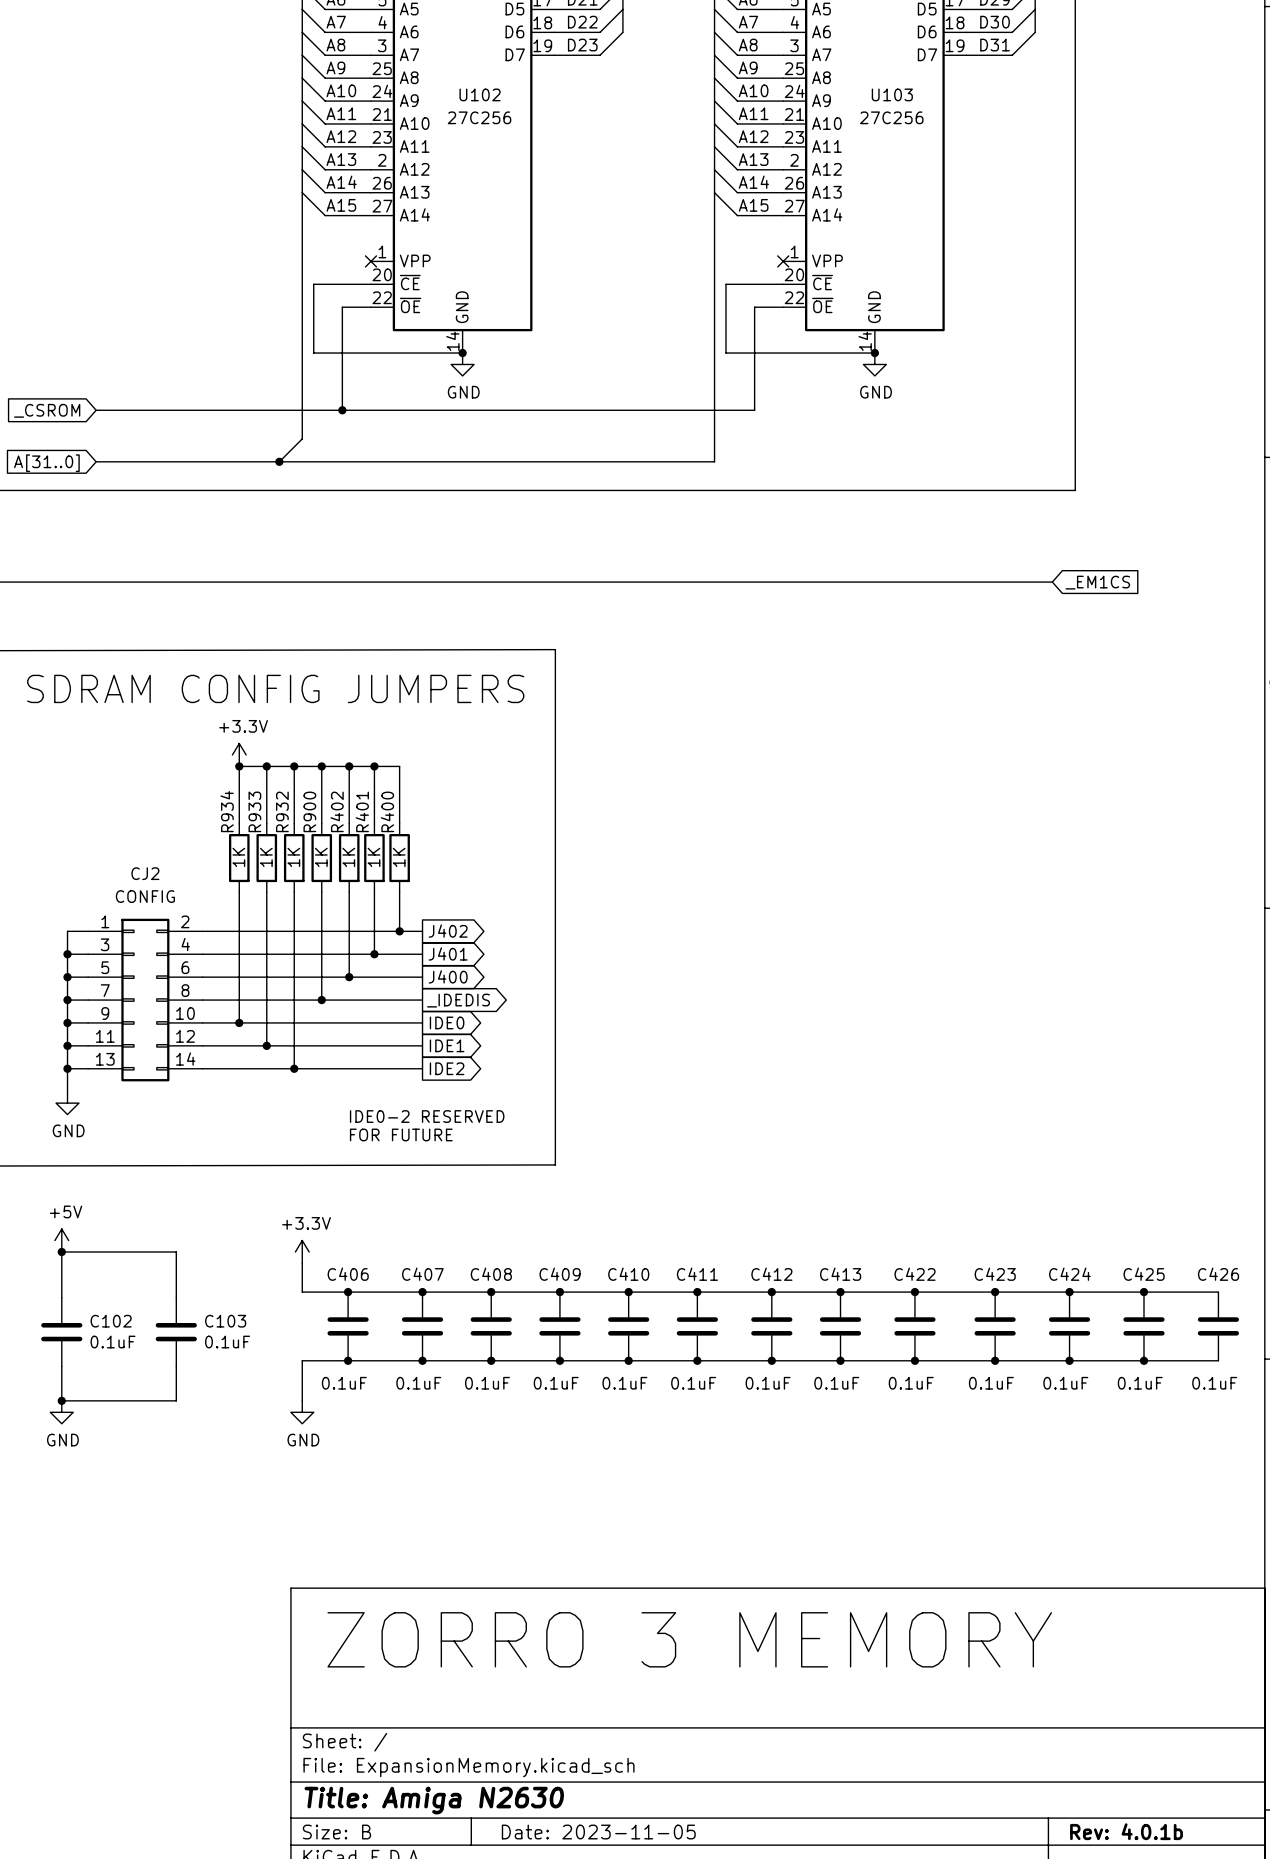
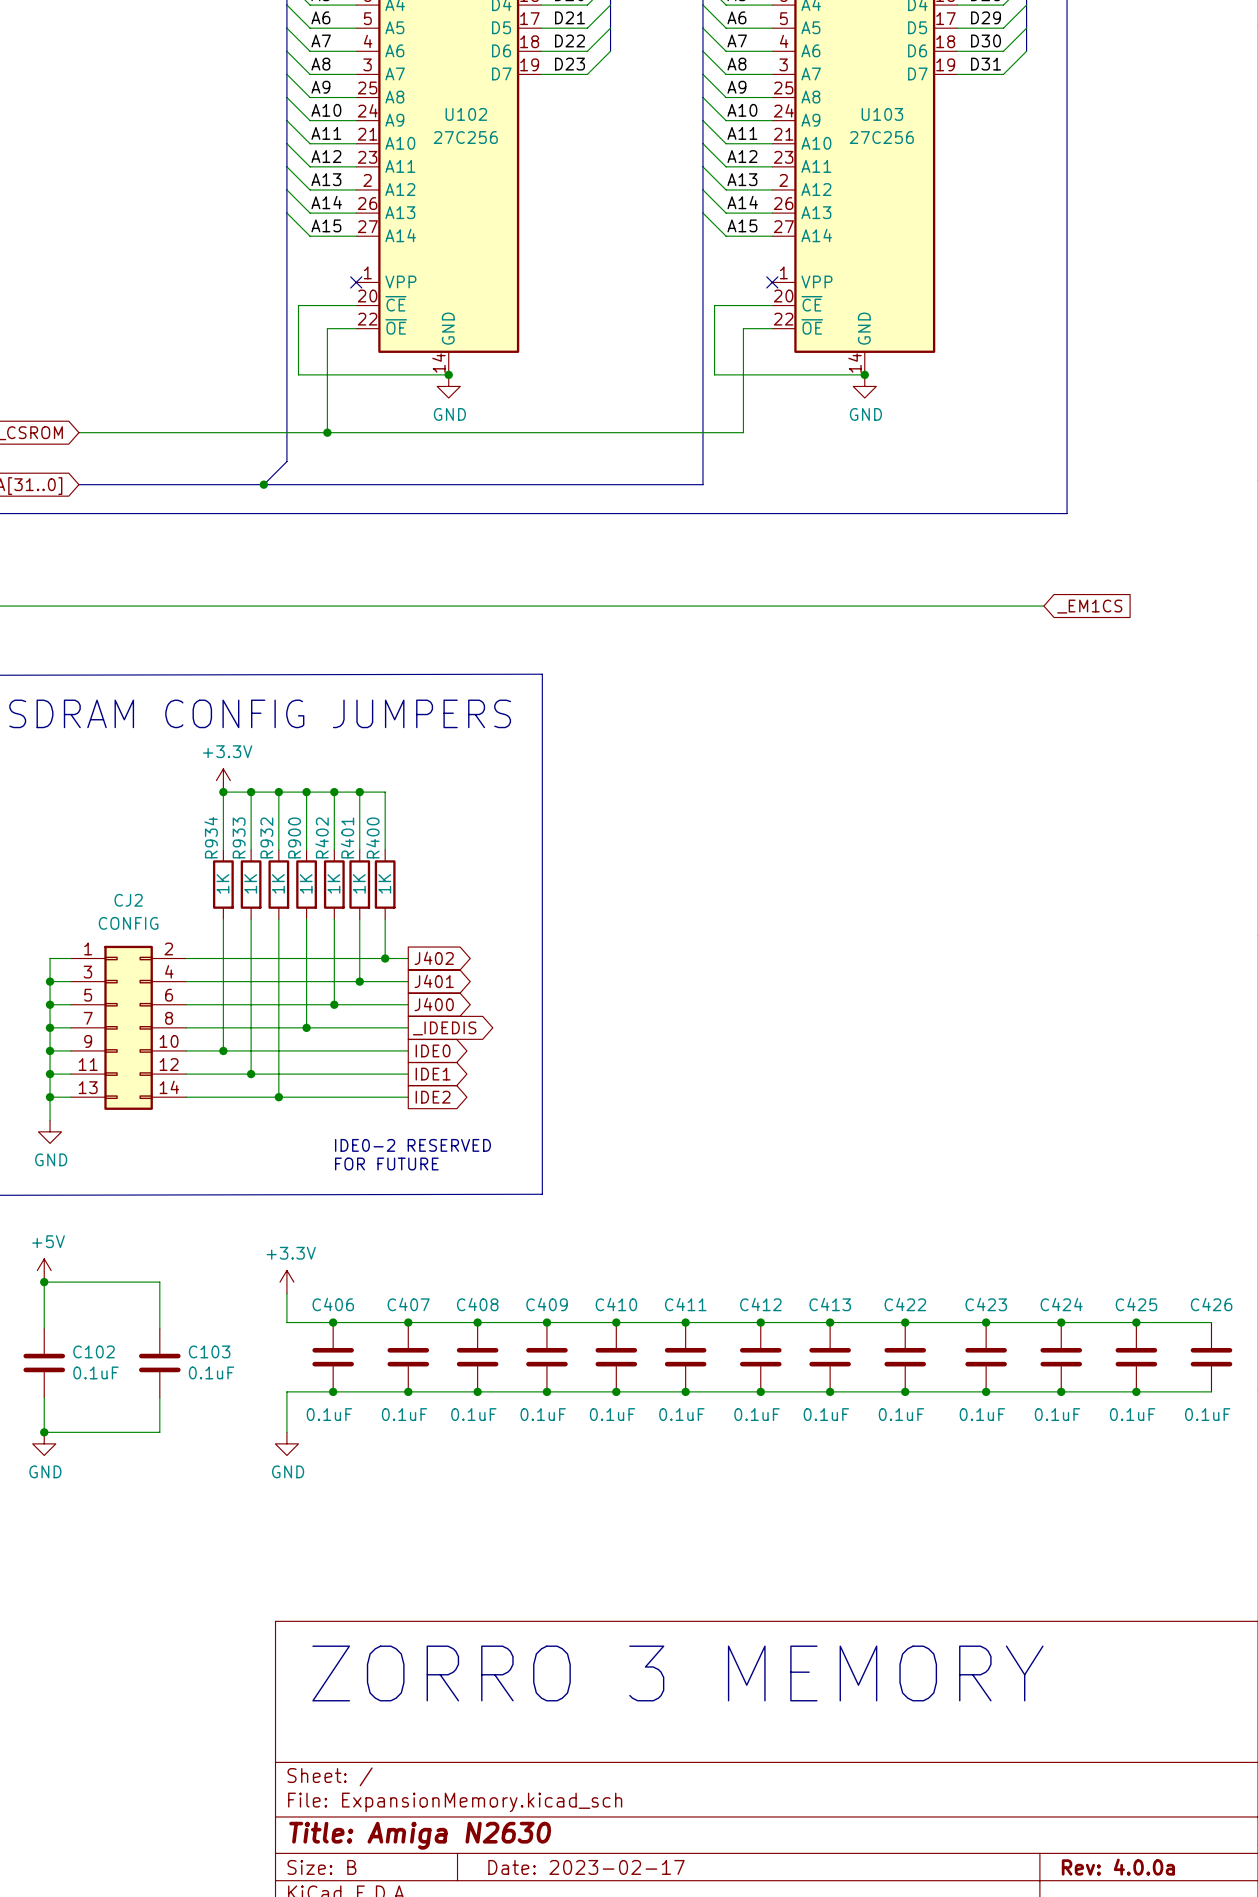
title block: Rev: 4.0.1b (1126, 1831) -> Rev: 4.0.0a (1118, 1867)
title block: Date: 2023-11-05 (598, 1832) -> Date: 2023-02-17 (586, 1867)

